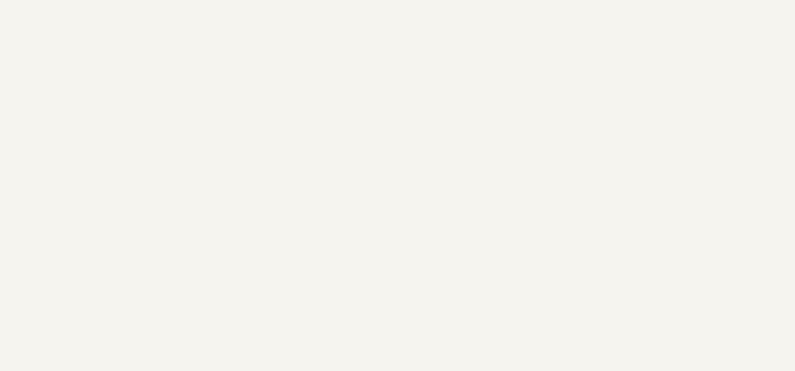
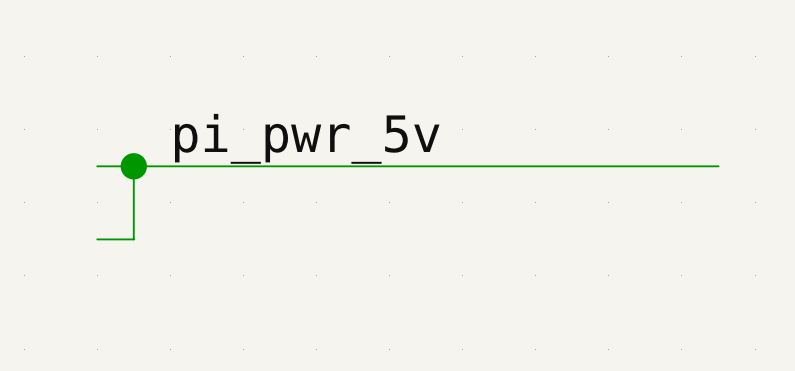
label: none -> pi_pwr_5v (307, 138)
wire: none -> (97, 166) (718, 166)
wire: none -> (133, 166) (133, 239) (97, 239)
junction: none -> (133, 166)

